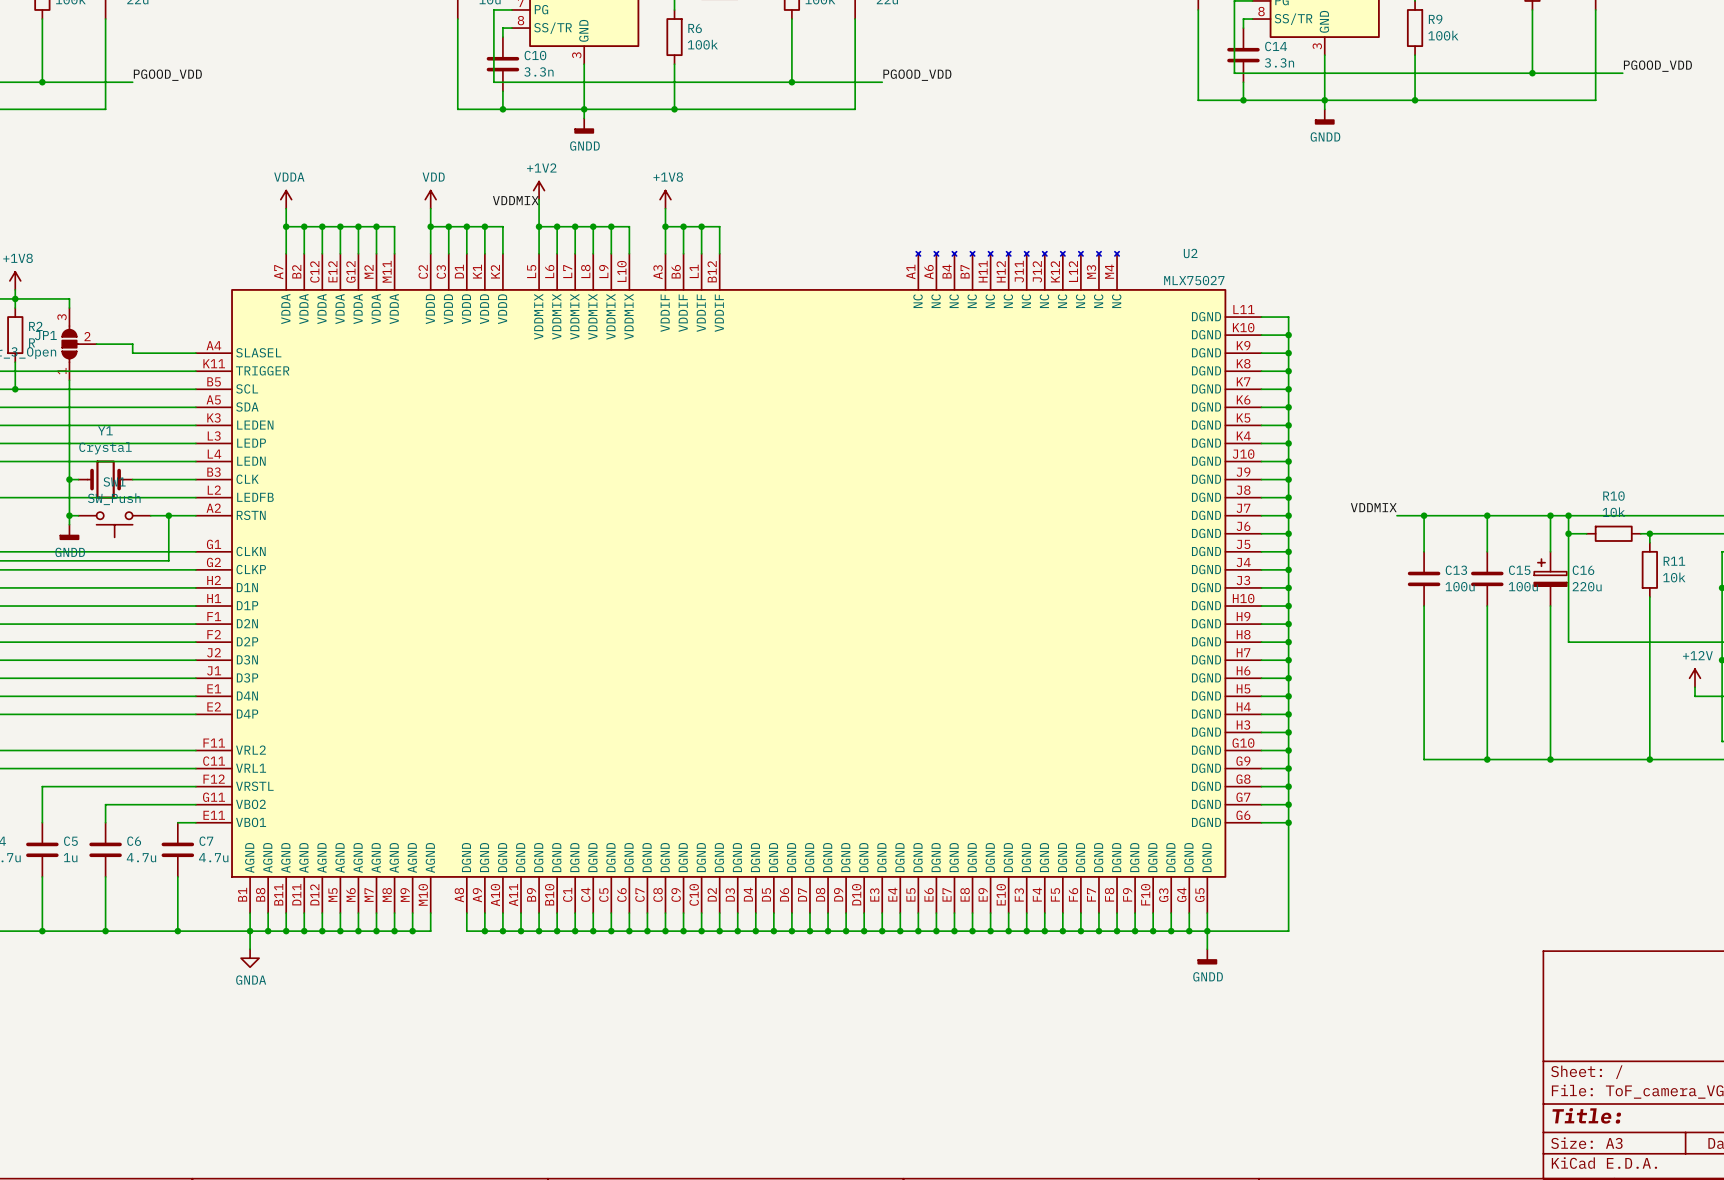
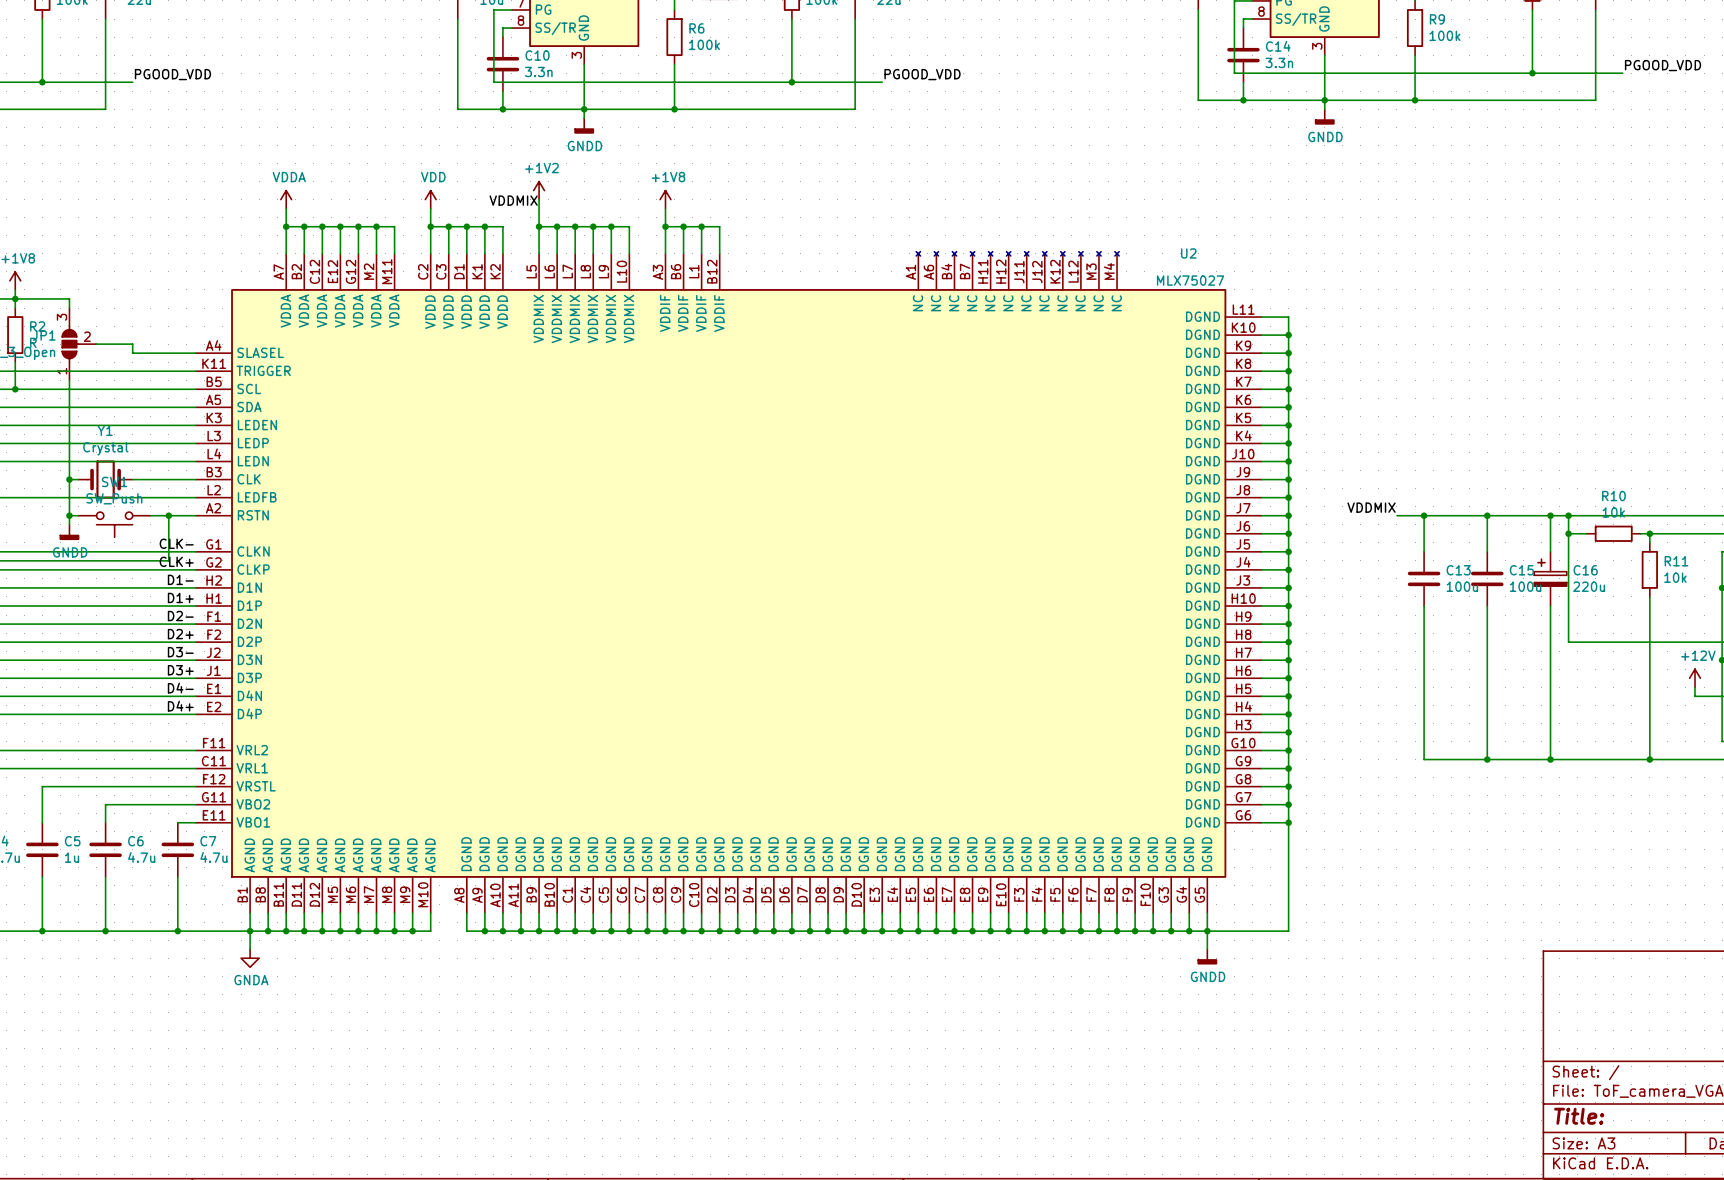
label: none -> CLK- (176, 543)
label: none -> CLK+ (176, 561)
label: none -> D1- (180, 579)
label: none -> D1+ (180, 597)
label: none -> D2- (180, 616)
label: none -> D2+ (180, 634)
label: none -> D3- (180, 652)
label: none -> D3+ (180, 670)
label: none -> D4- (180, 688)
label: none -> D4+ (180, 706)

